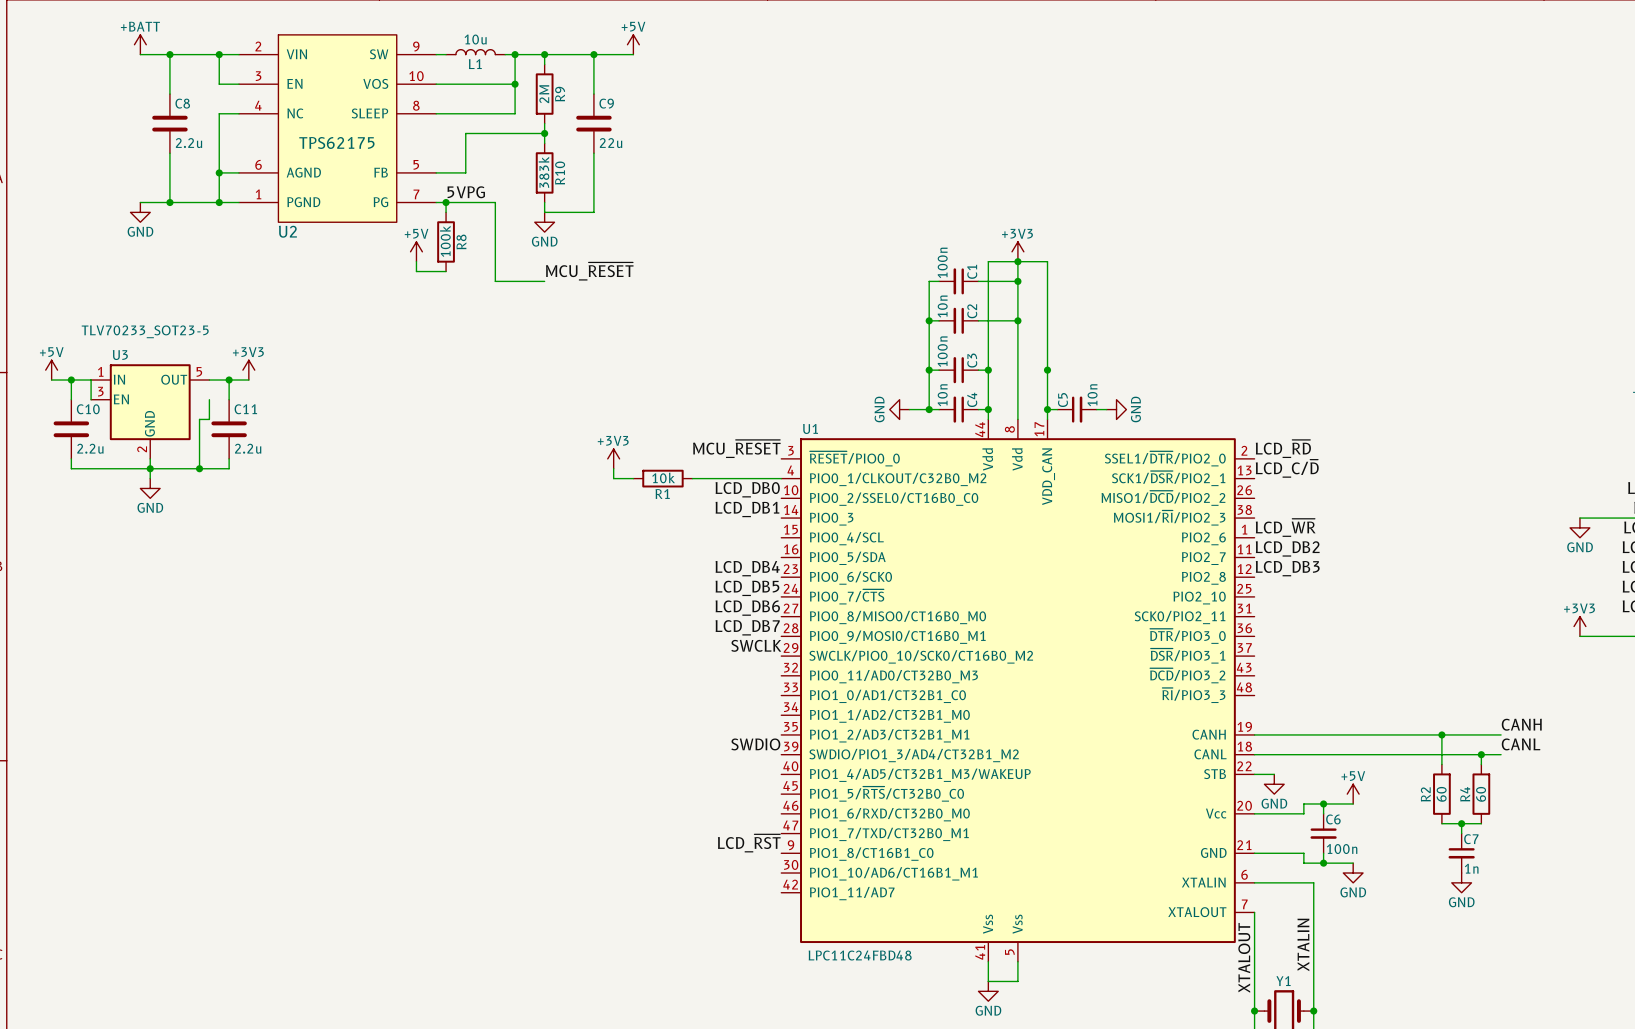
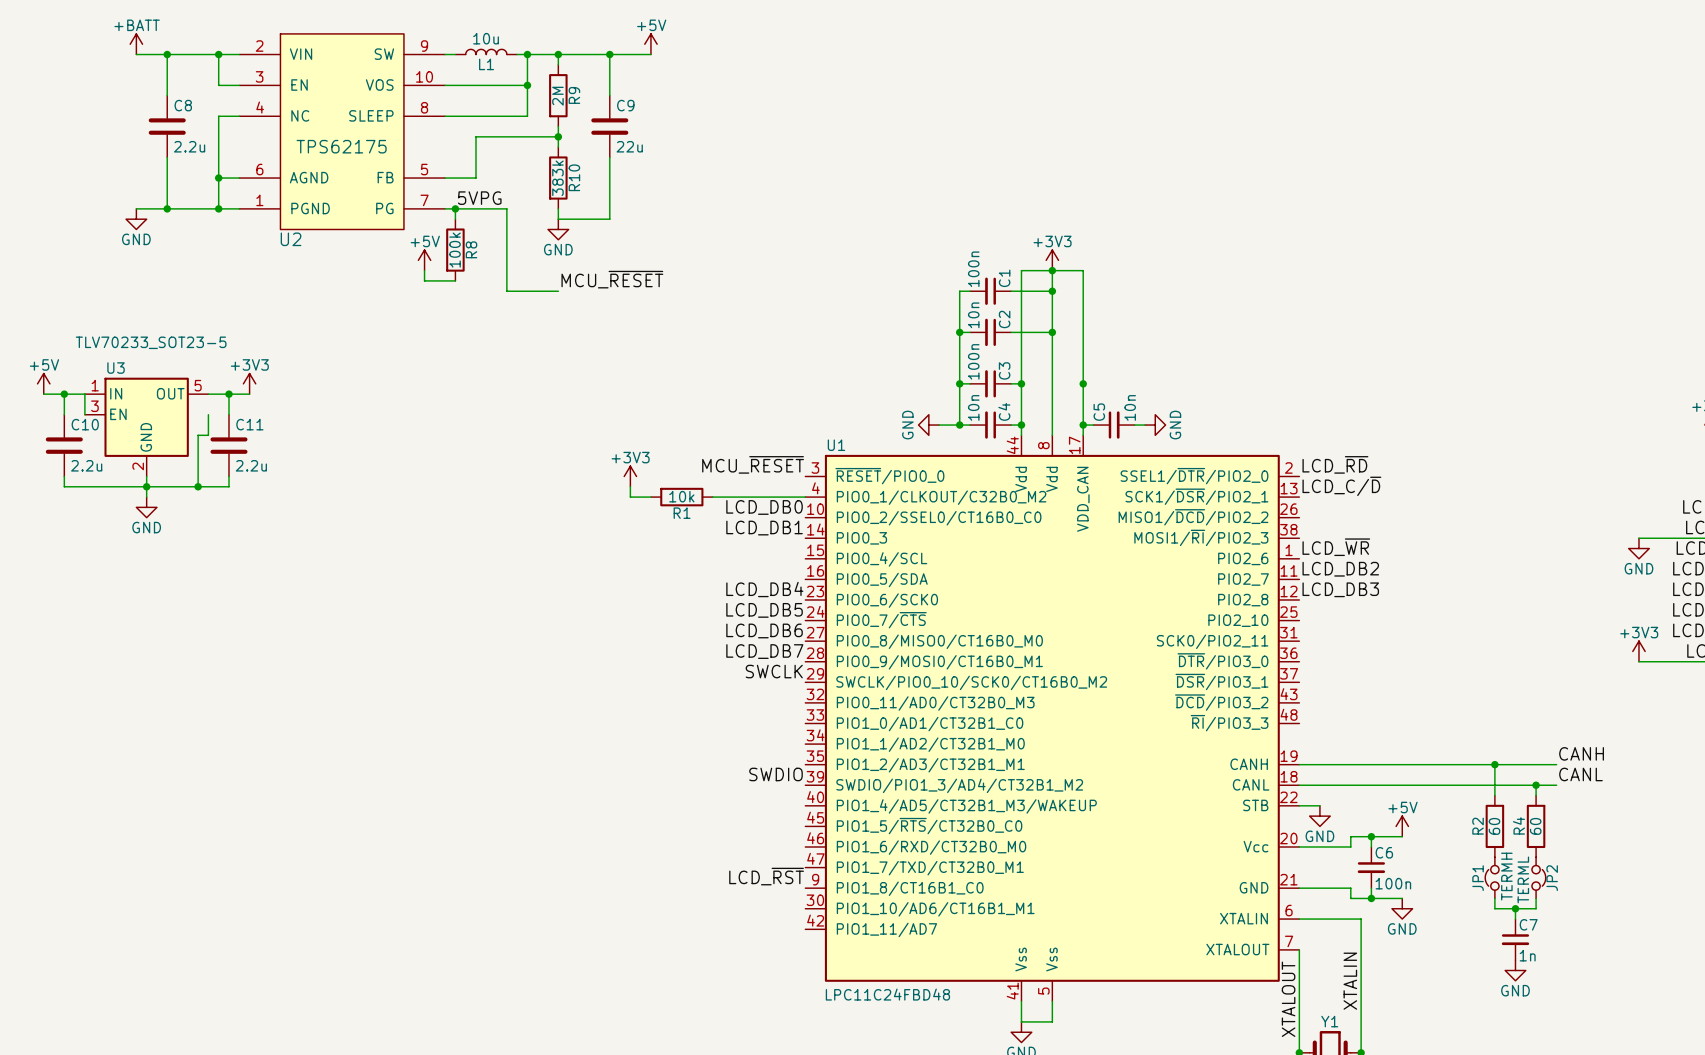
wire: (1441, 823) (1481, 823) -> none
junction: (1461, 823) -> none
JP1: none -> TERMH (1492, 877)
JP2: none -> TERML (1538, 877)
C7 position: (1461, 853) -> (1515, 939)
wire: none -> (1494, 898) (1494, 908) (1536, 908) (1536, 898)
junction: none -> (1515, 908)
power symbol position: GND (1461, 882) -> GND (1515, 970)

